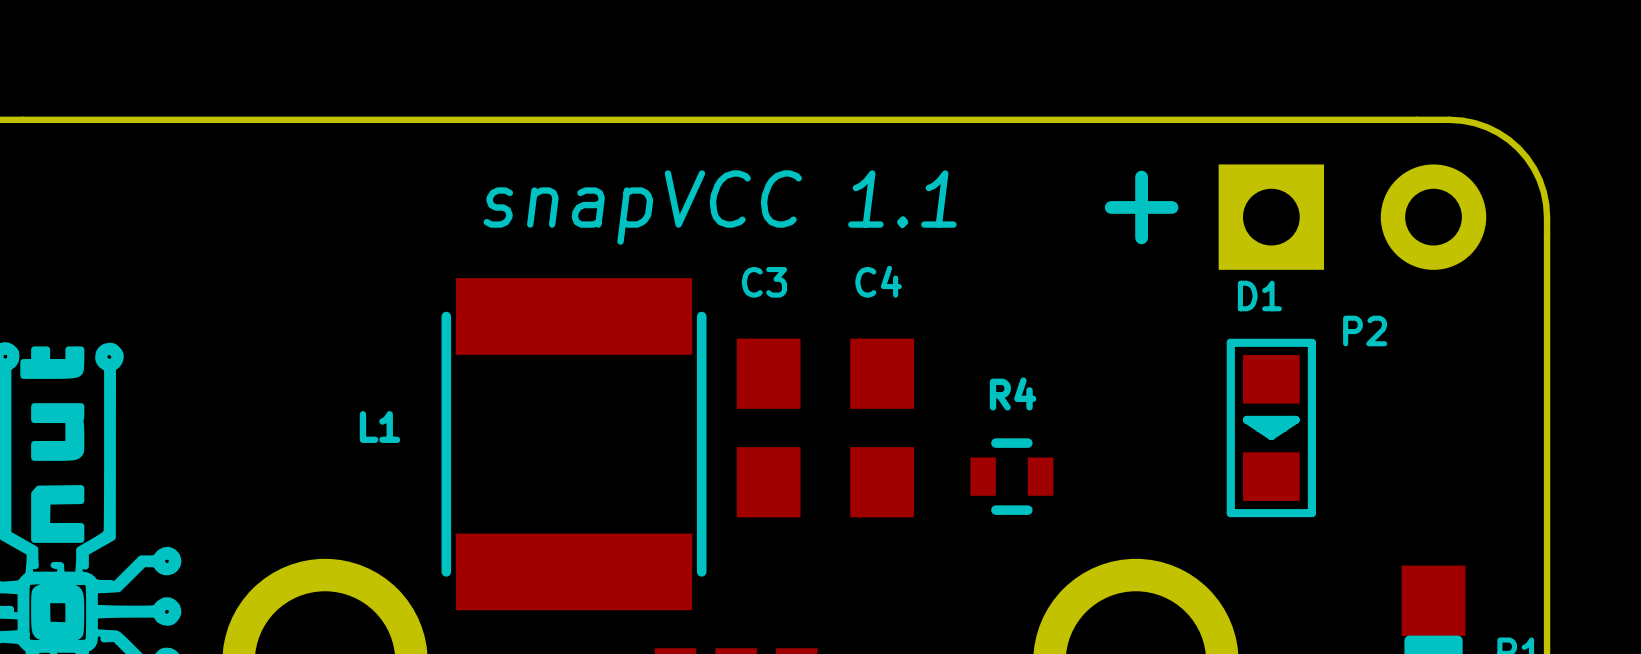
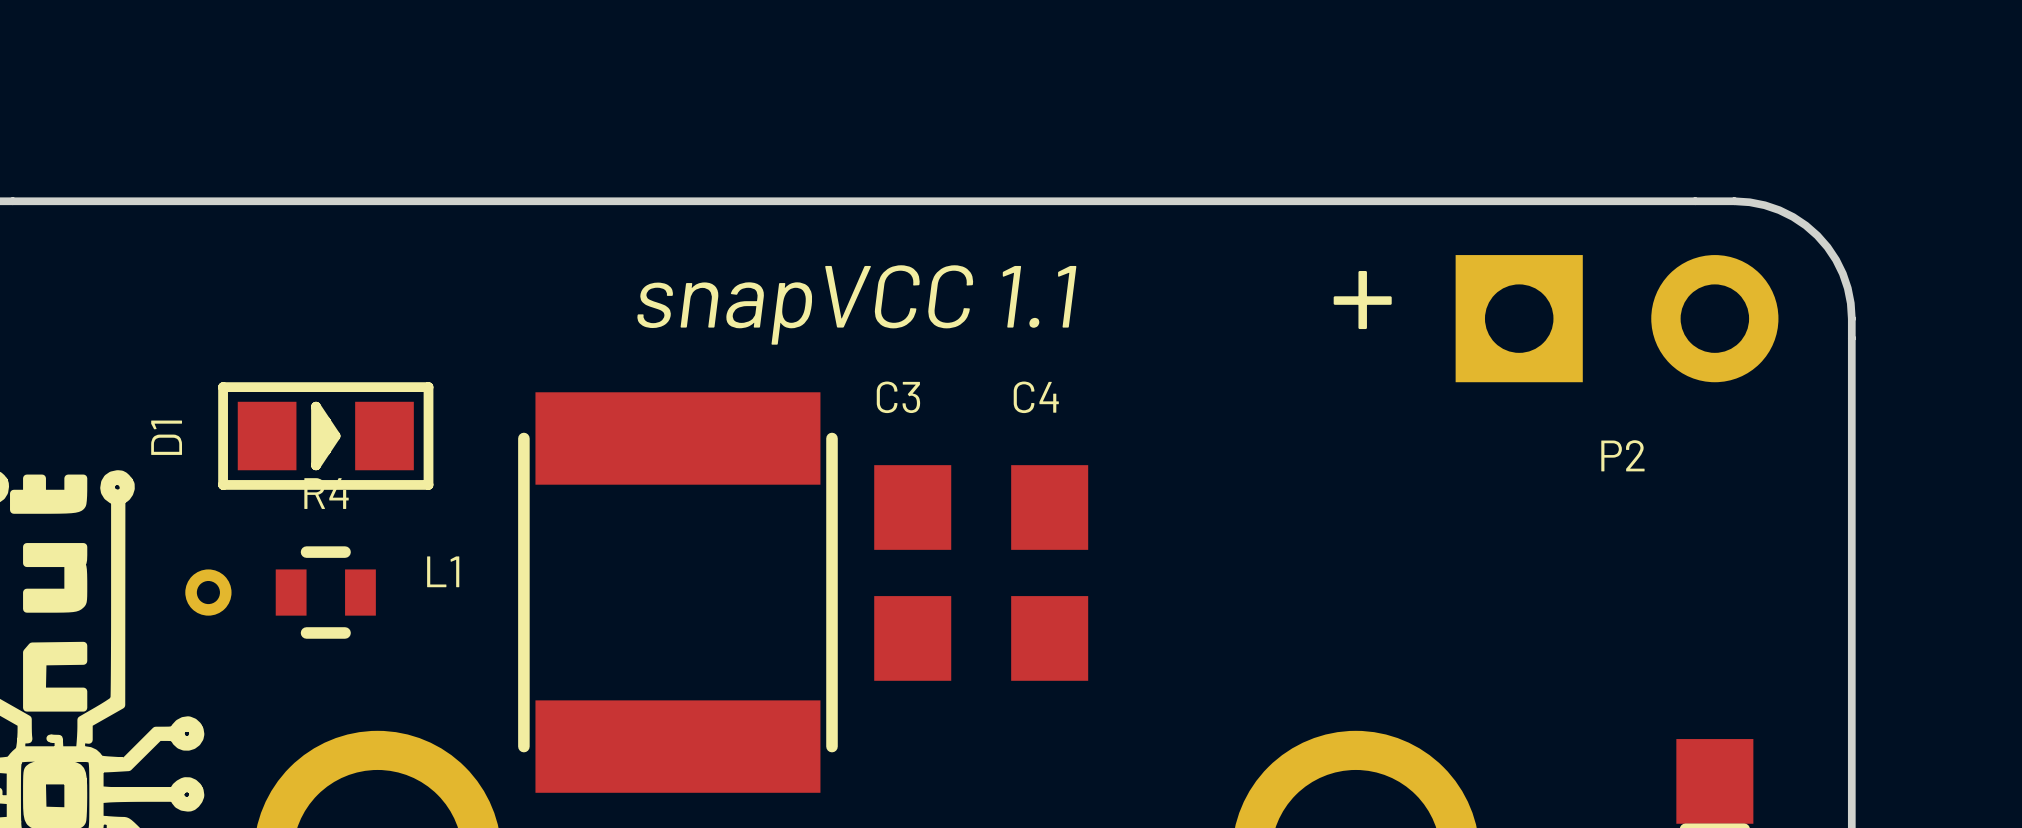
D1 rotation: 0° (1271, 427) -> 90° counterclockwise (325, 436)
D1 position: (1271, 427) -> (325, 436)
part: none -> (208, 592)
R4 position: (1011, 476) -> (325, 592)

